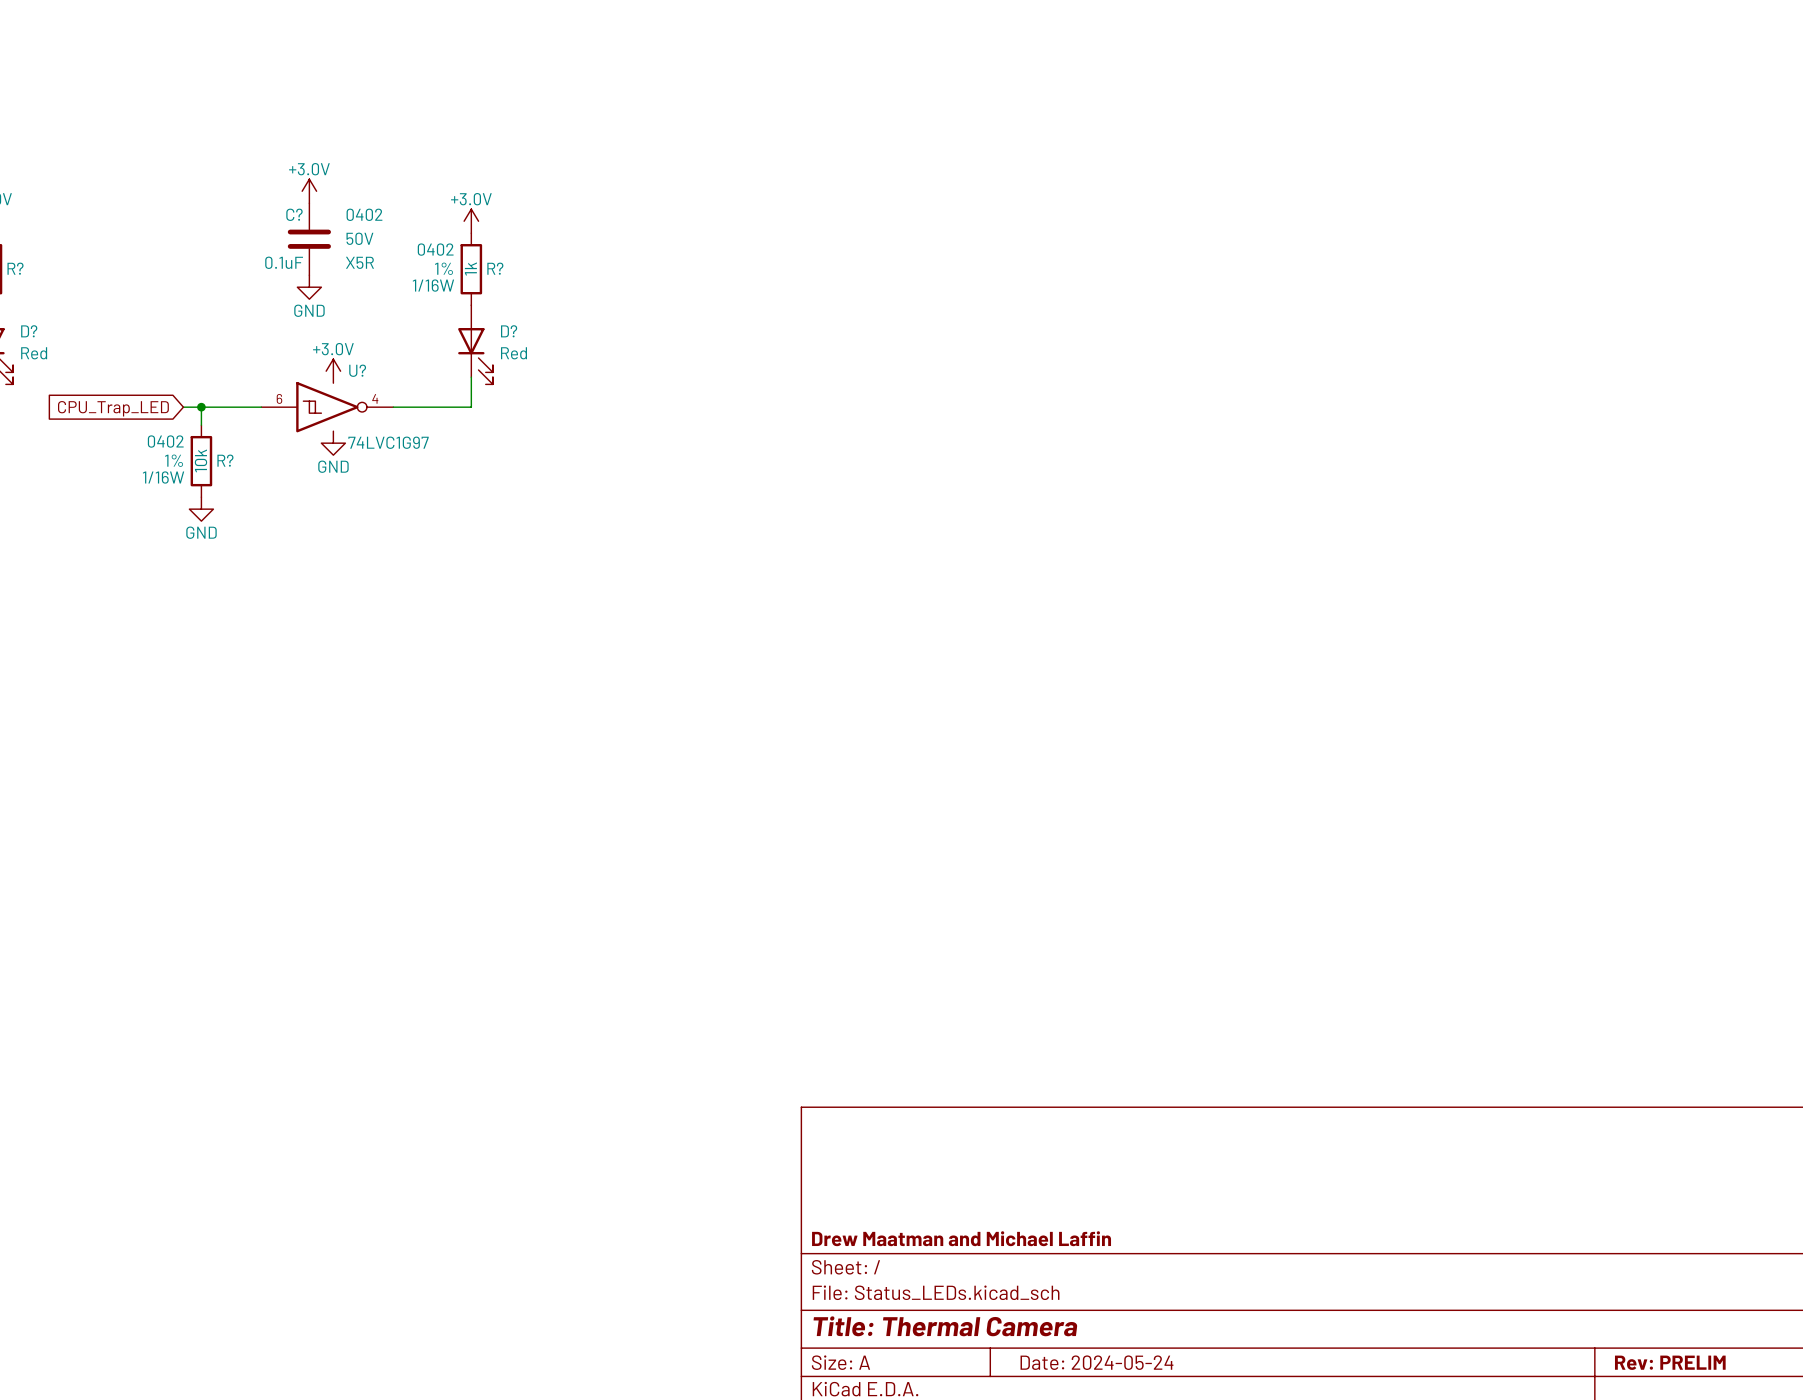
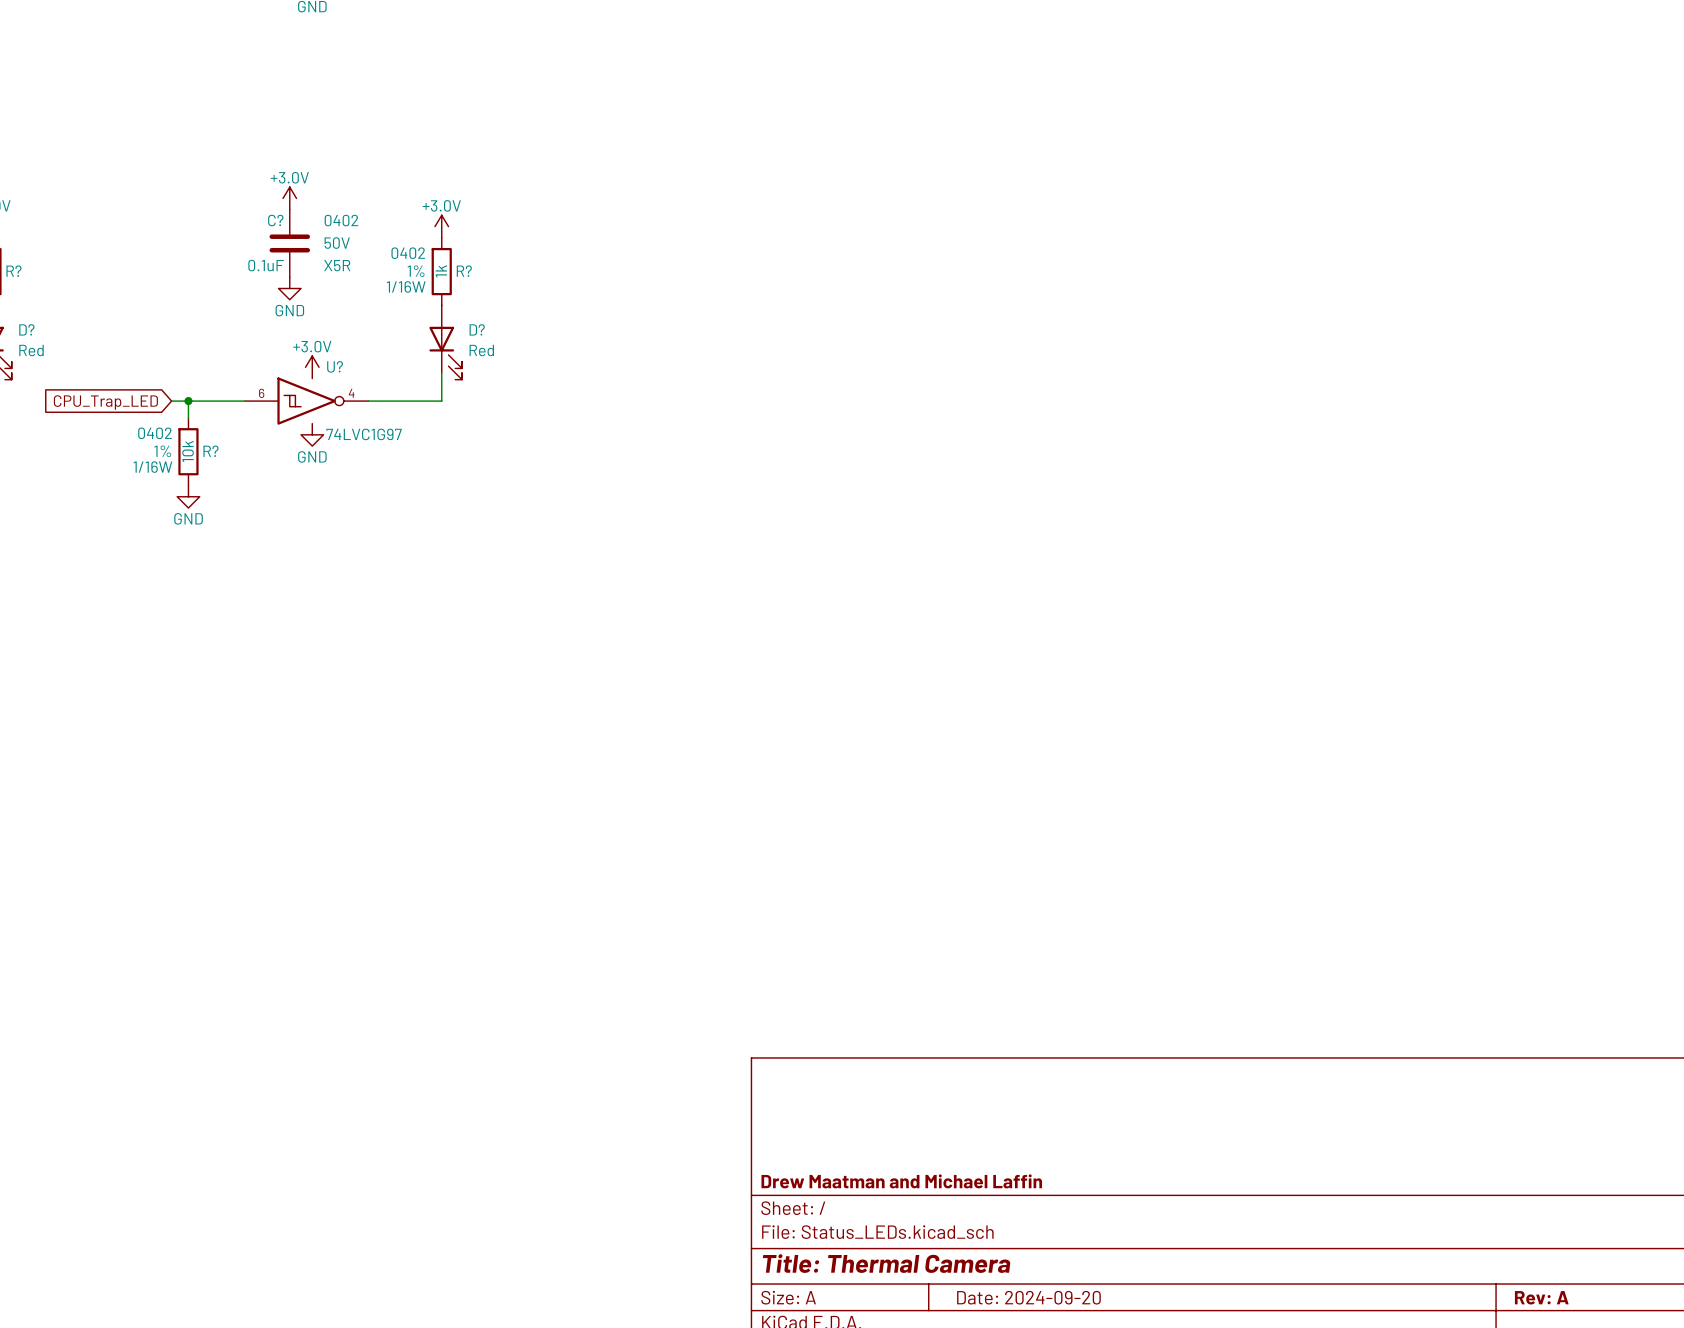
title block: Date: 2024-05-24 (1096, 1362) -> Date: 2024-09-20 (1028, 1297)
title block: Rev: PRELIM (1670, 1362) -> Rev: A (1541, 1297)

